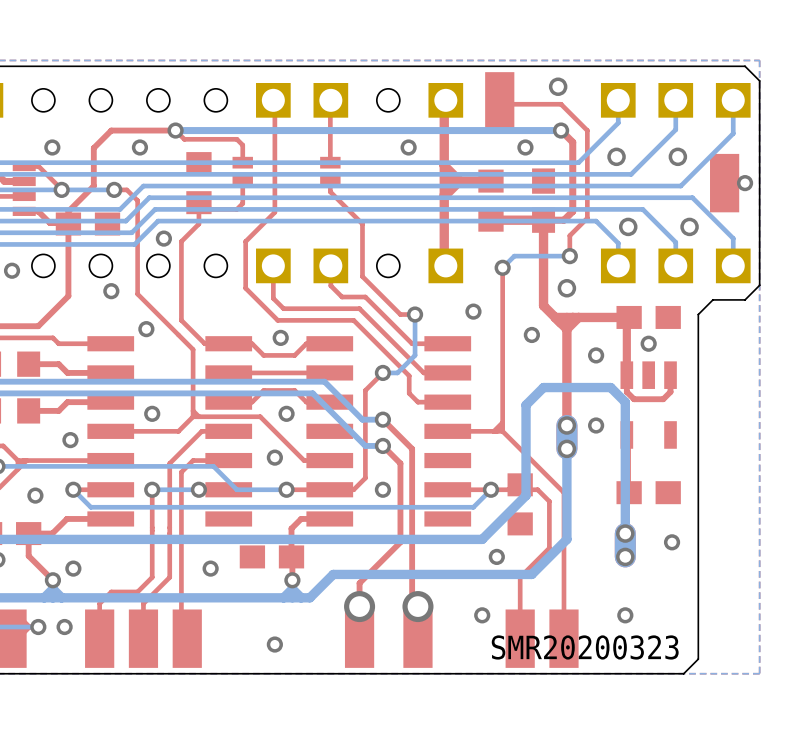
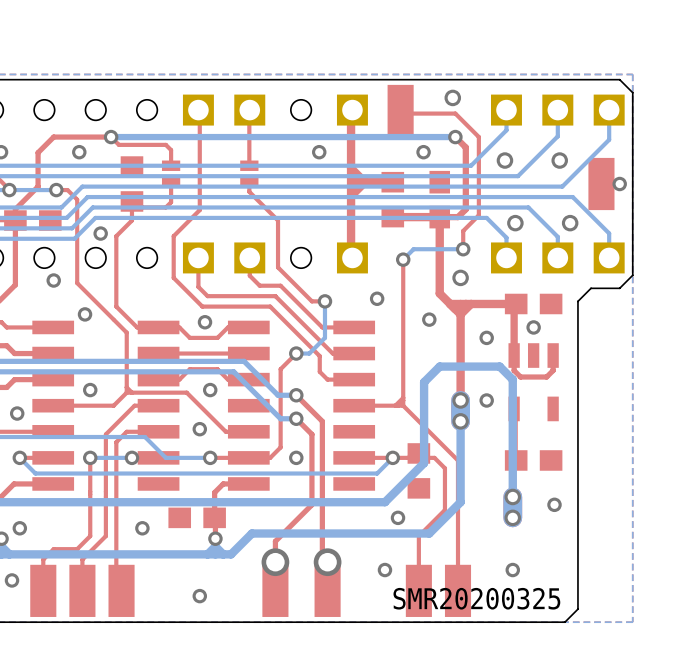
text: SMR20200323 (585, 647) -> SMR20200325 (476, 598)

